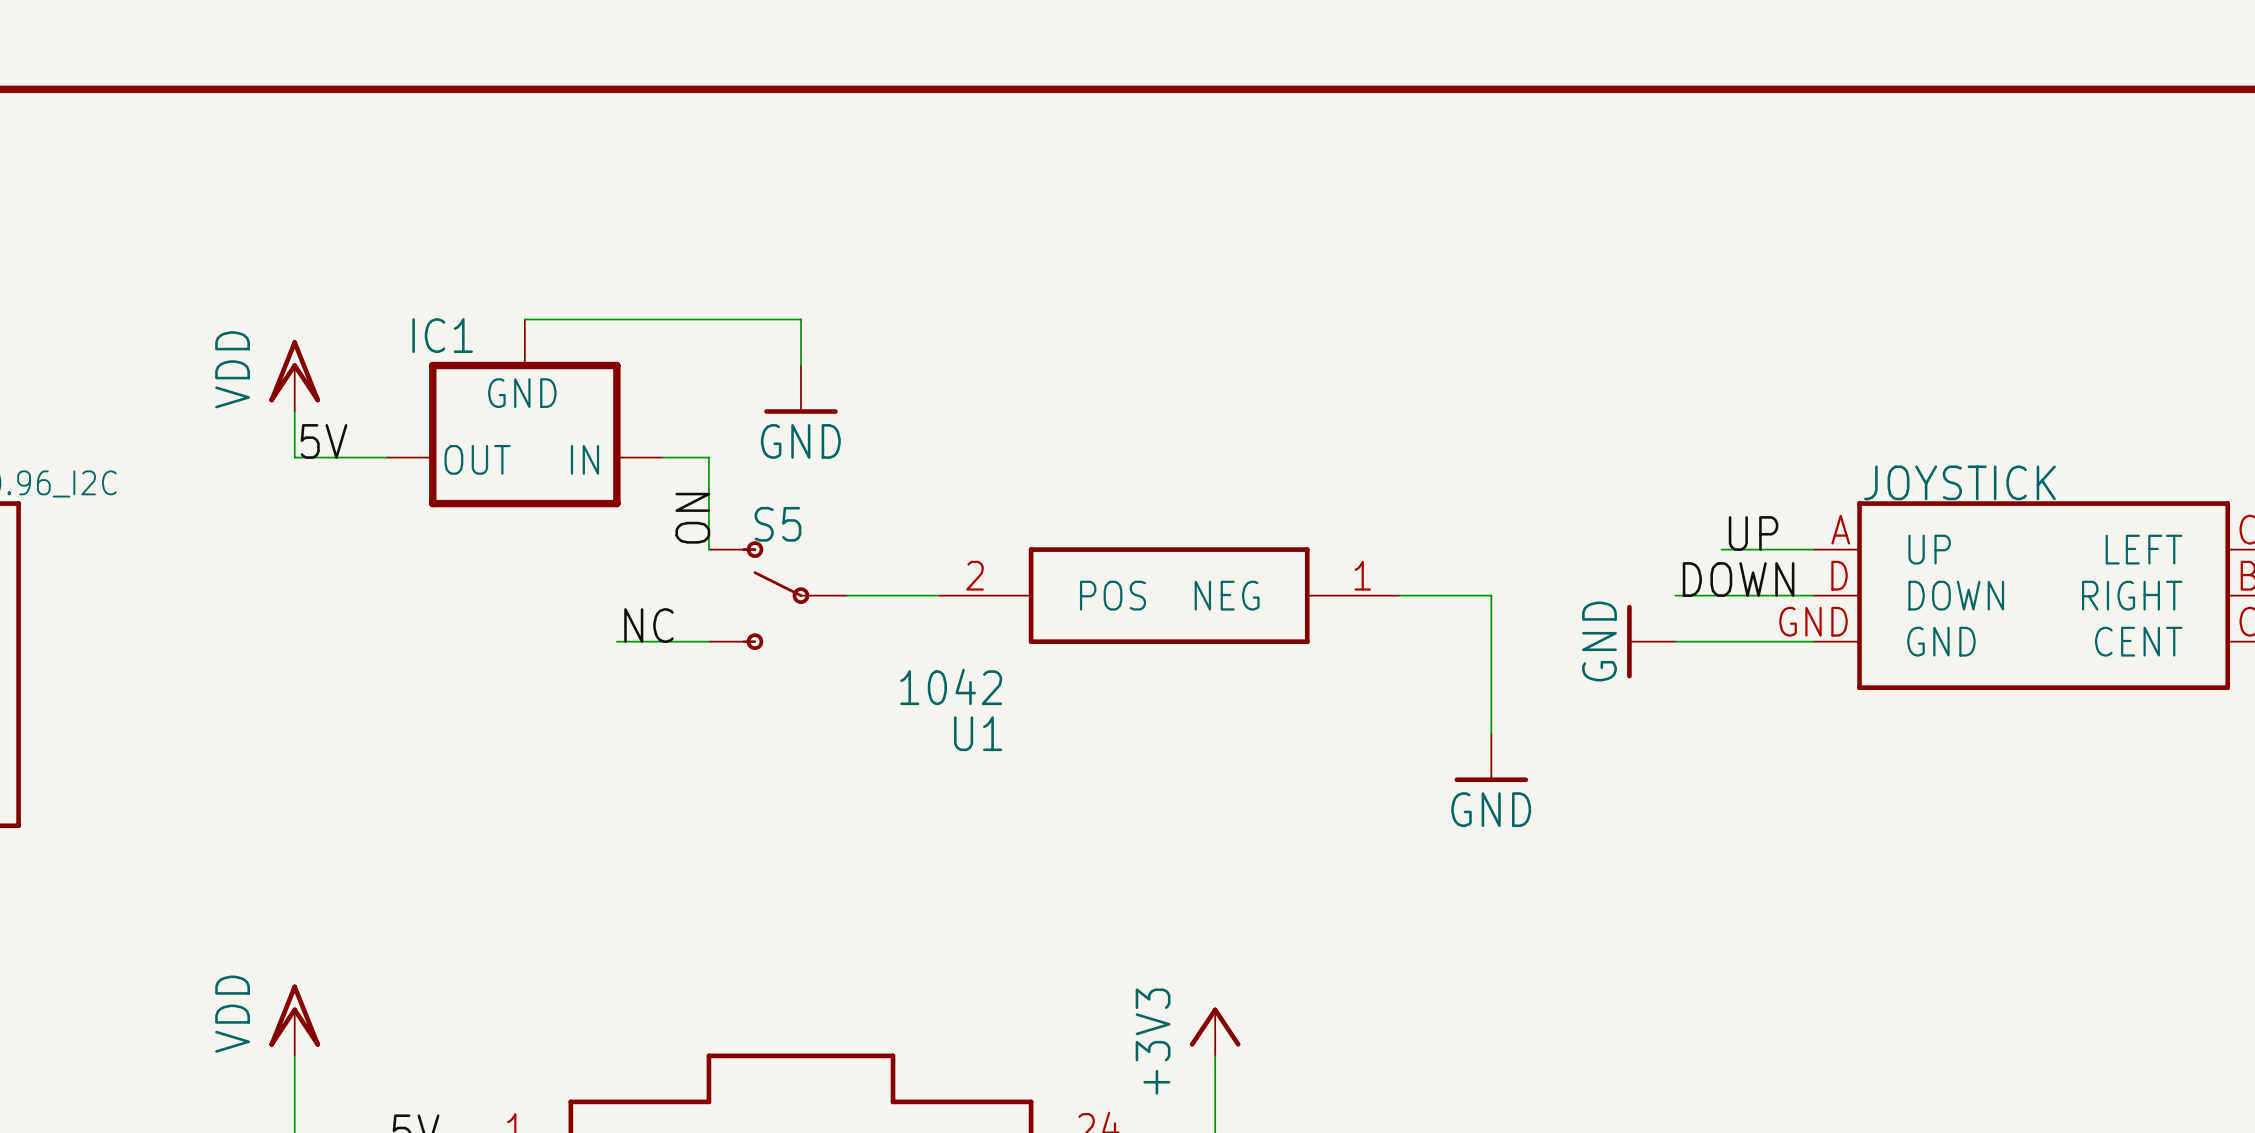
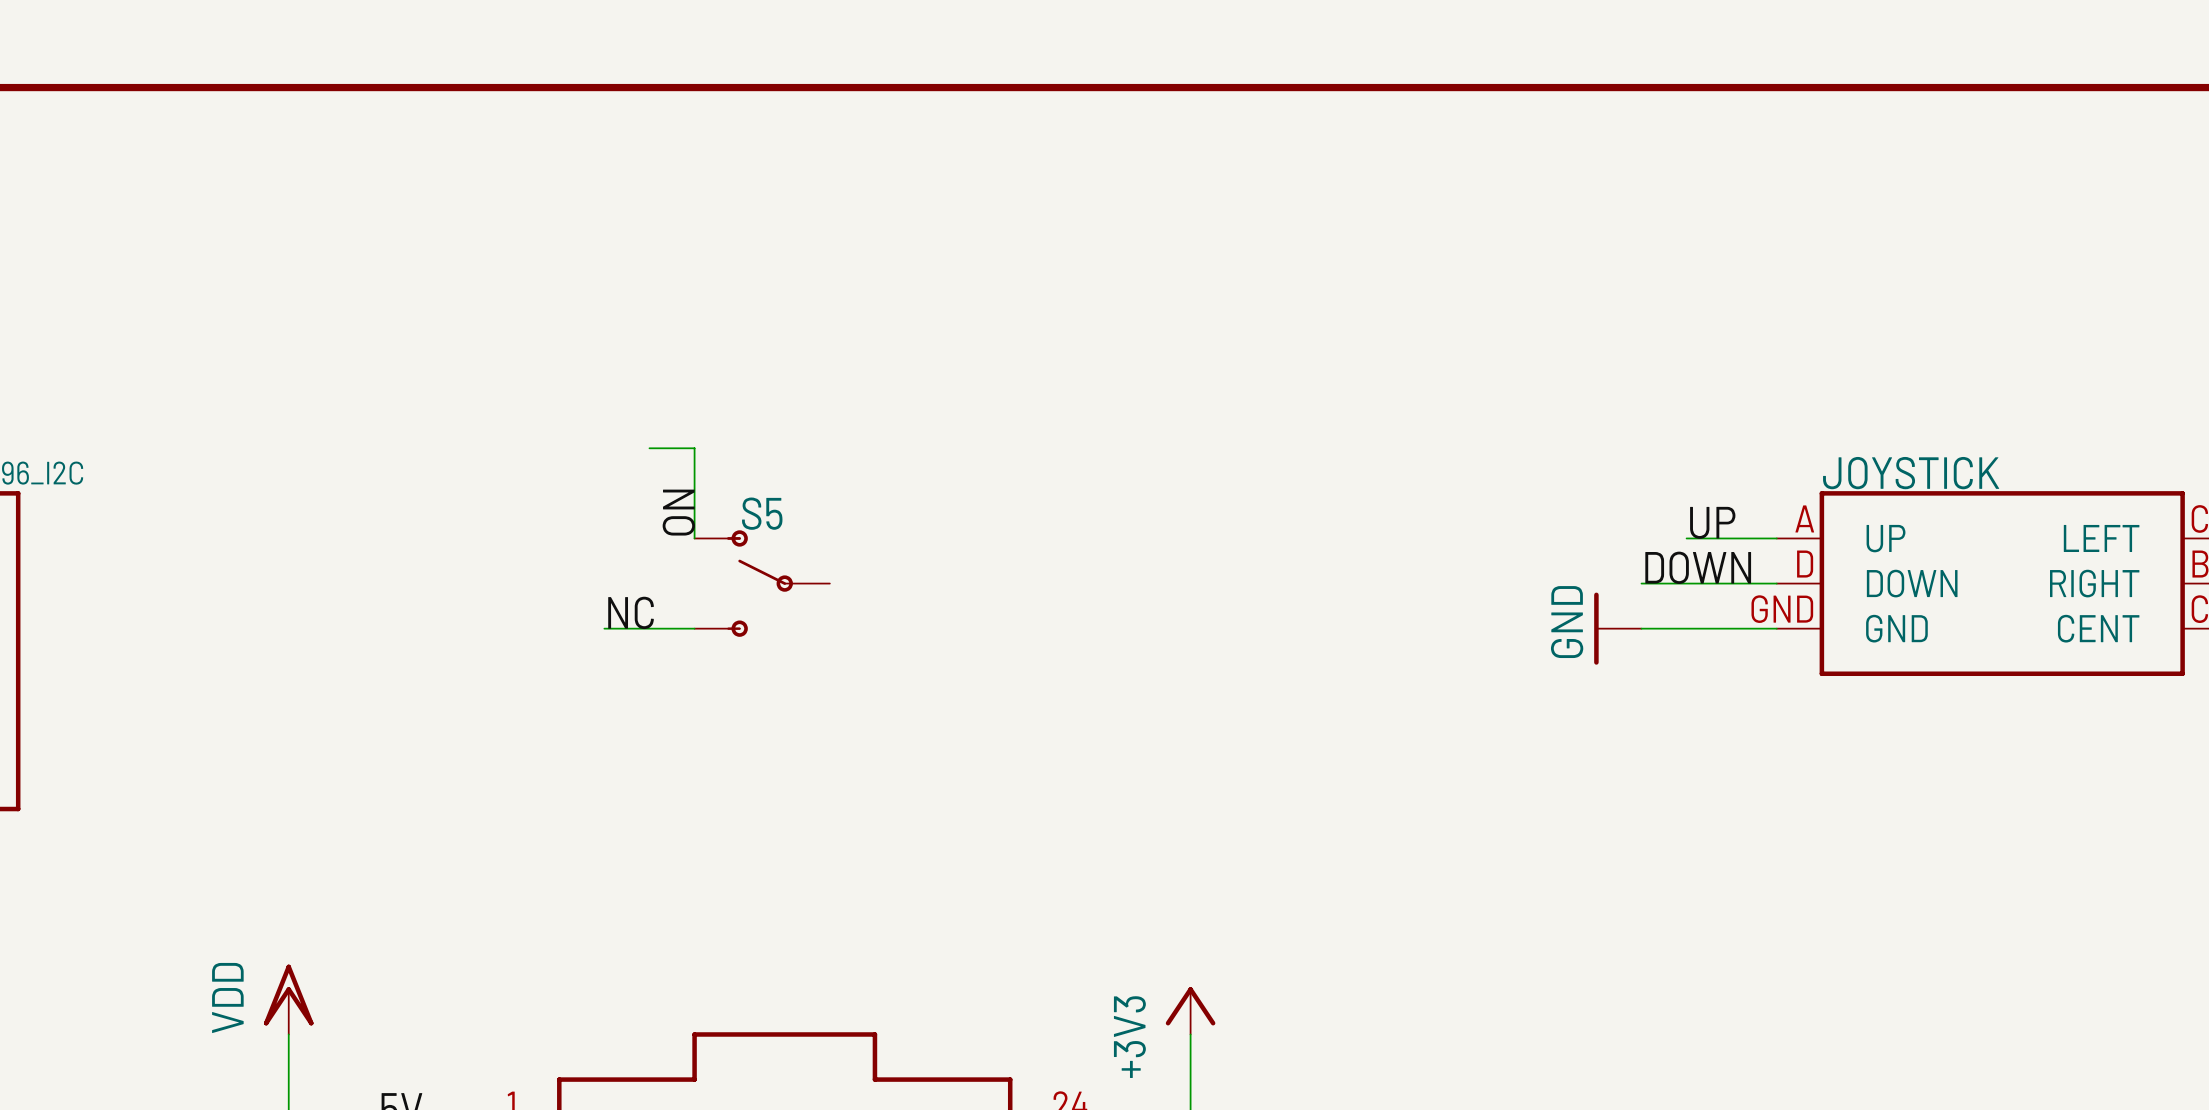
wire: (524, 319) (800, 319) (800, 365) -> none
power symbol: VDD (294, 375) -> none
power symbol: GND (800, 389) -> none
wire: (294, 411) (294, 457) (386, 457) -> none
IC1: (524, 413) -> none
label: 5V (324, 441) -> none
wire: (847, 595) (939, 595) -> none
U1: 1042 (1169, 595) -> none
wire: (1399, 595) (1491, 595) (1491, 733) -> none
power symbol: GND (1491, 757) -> none

